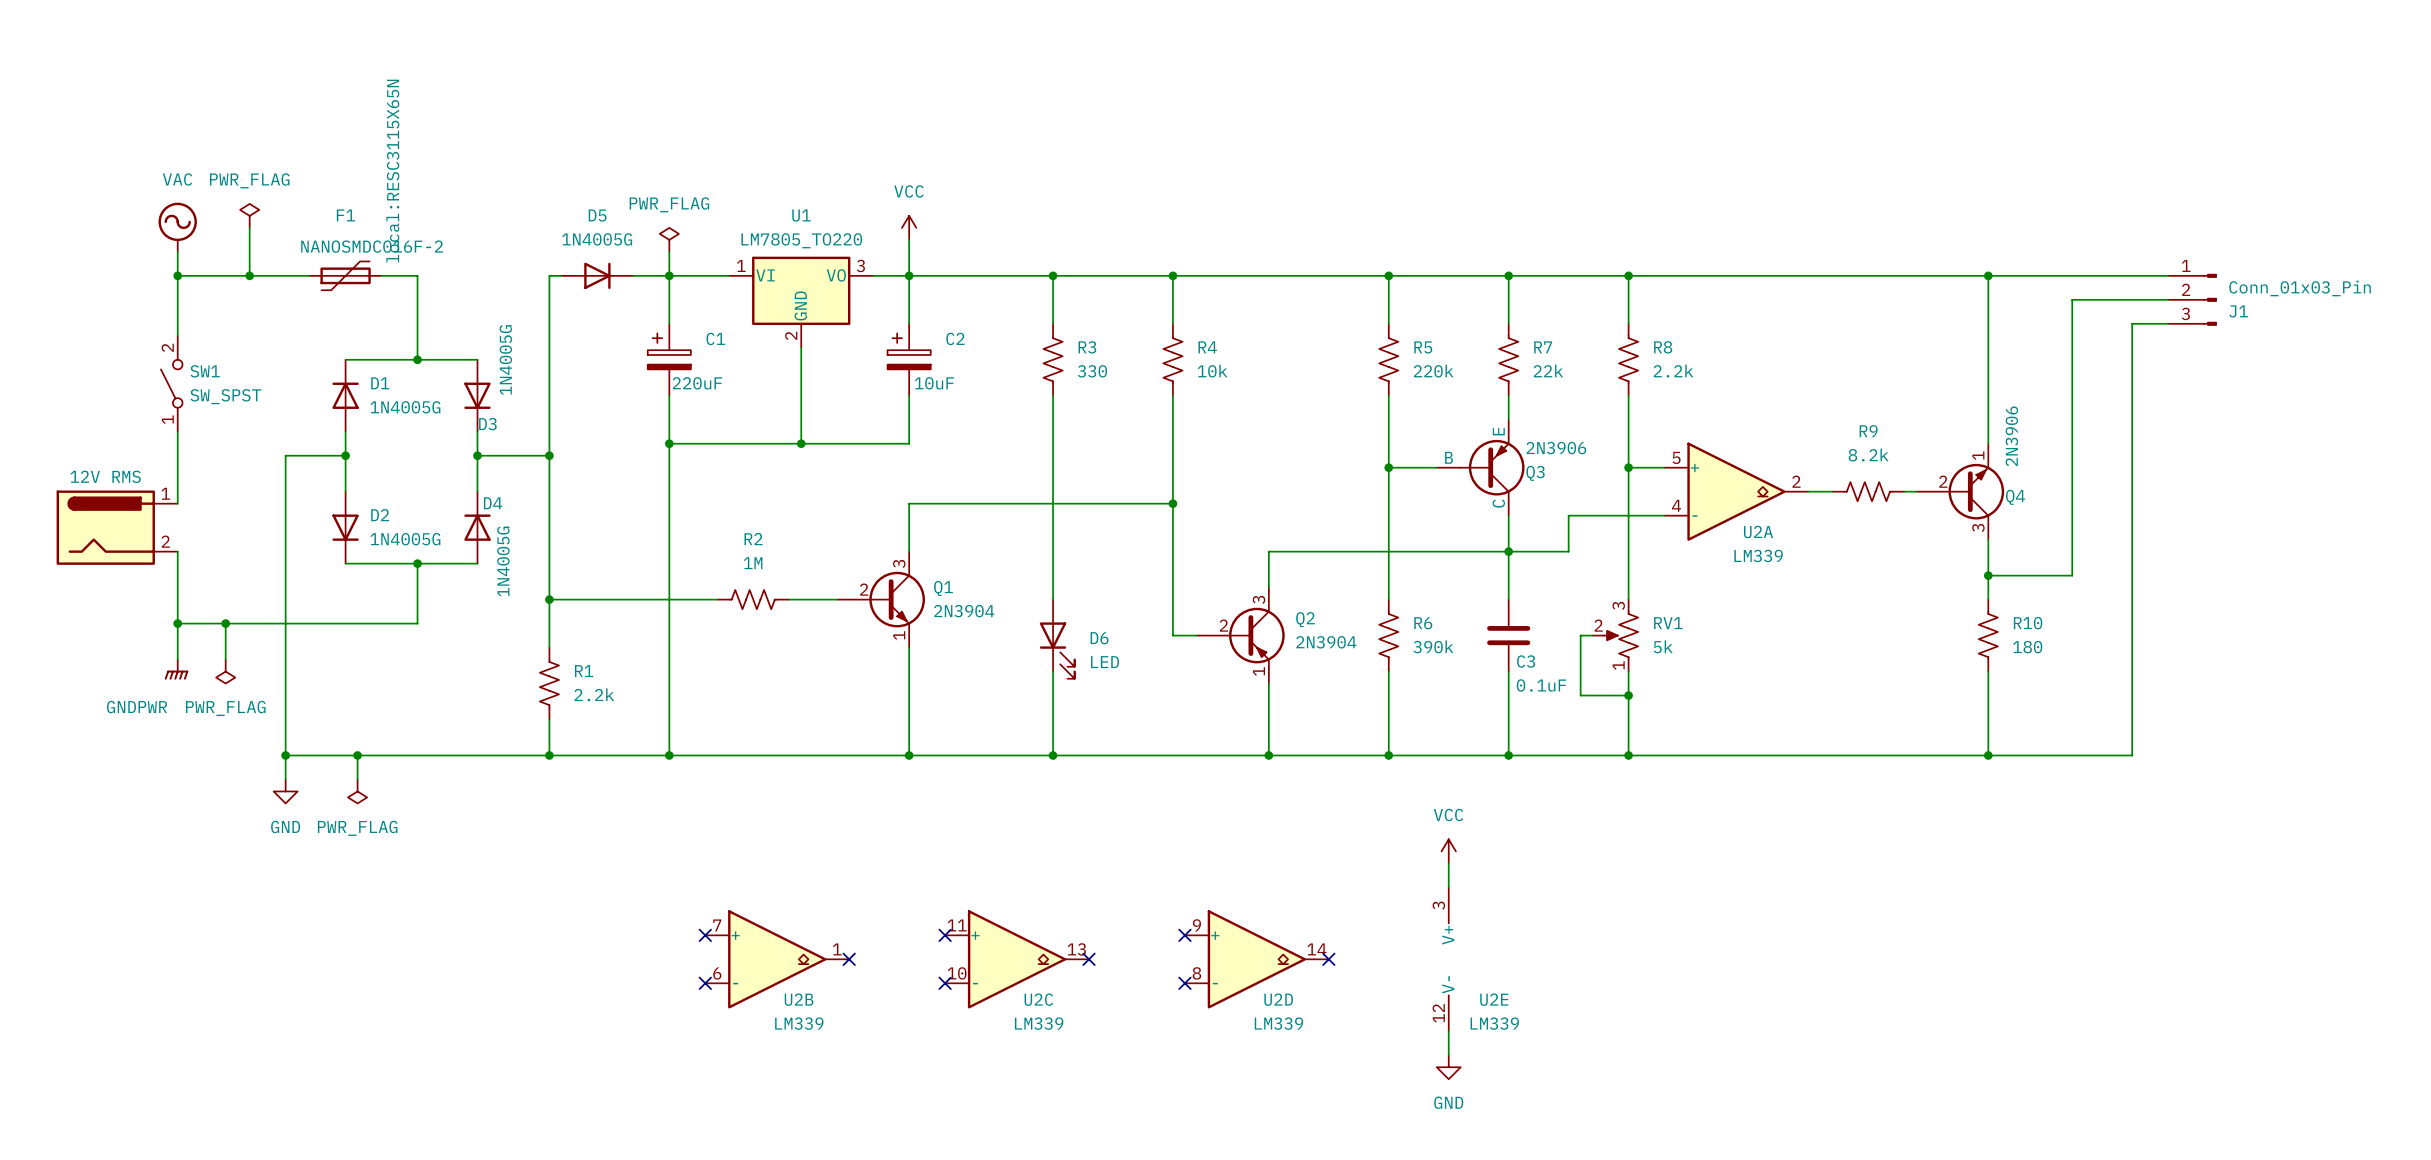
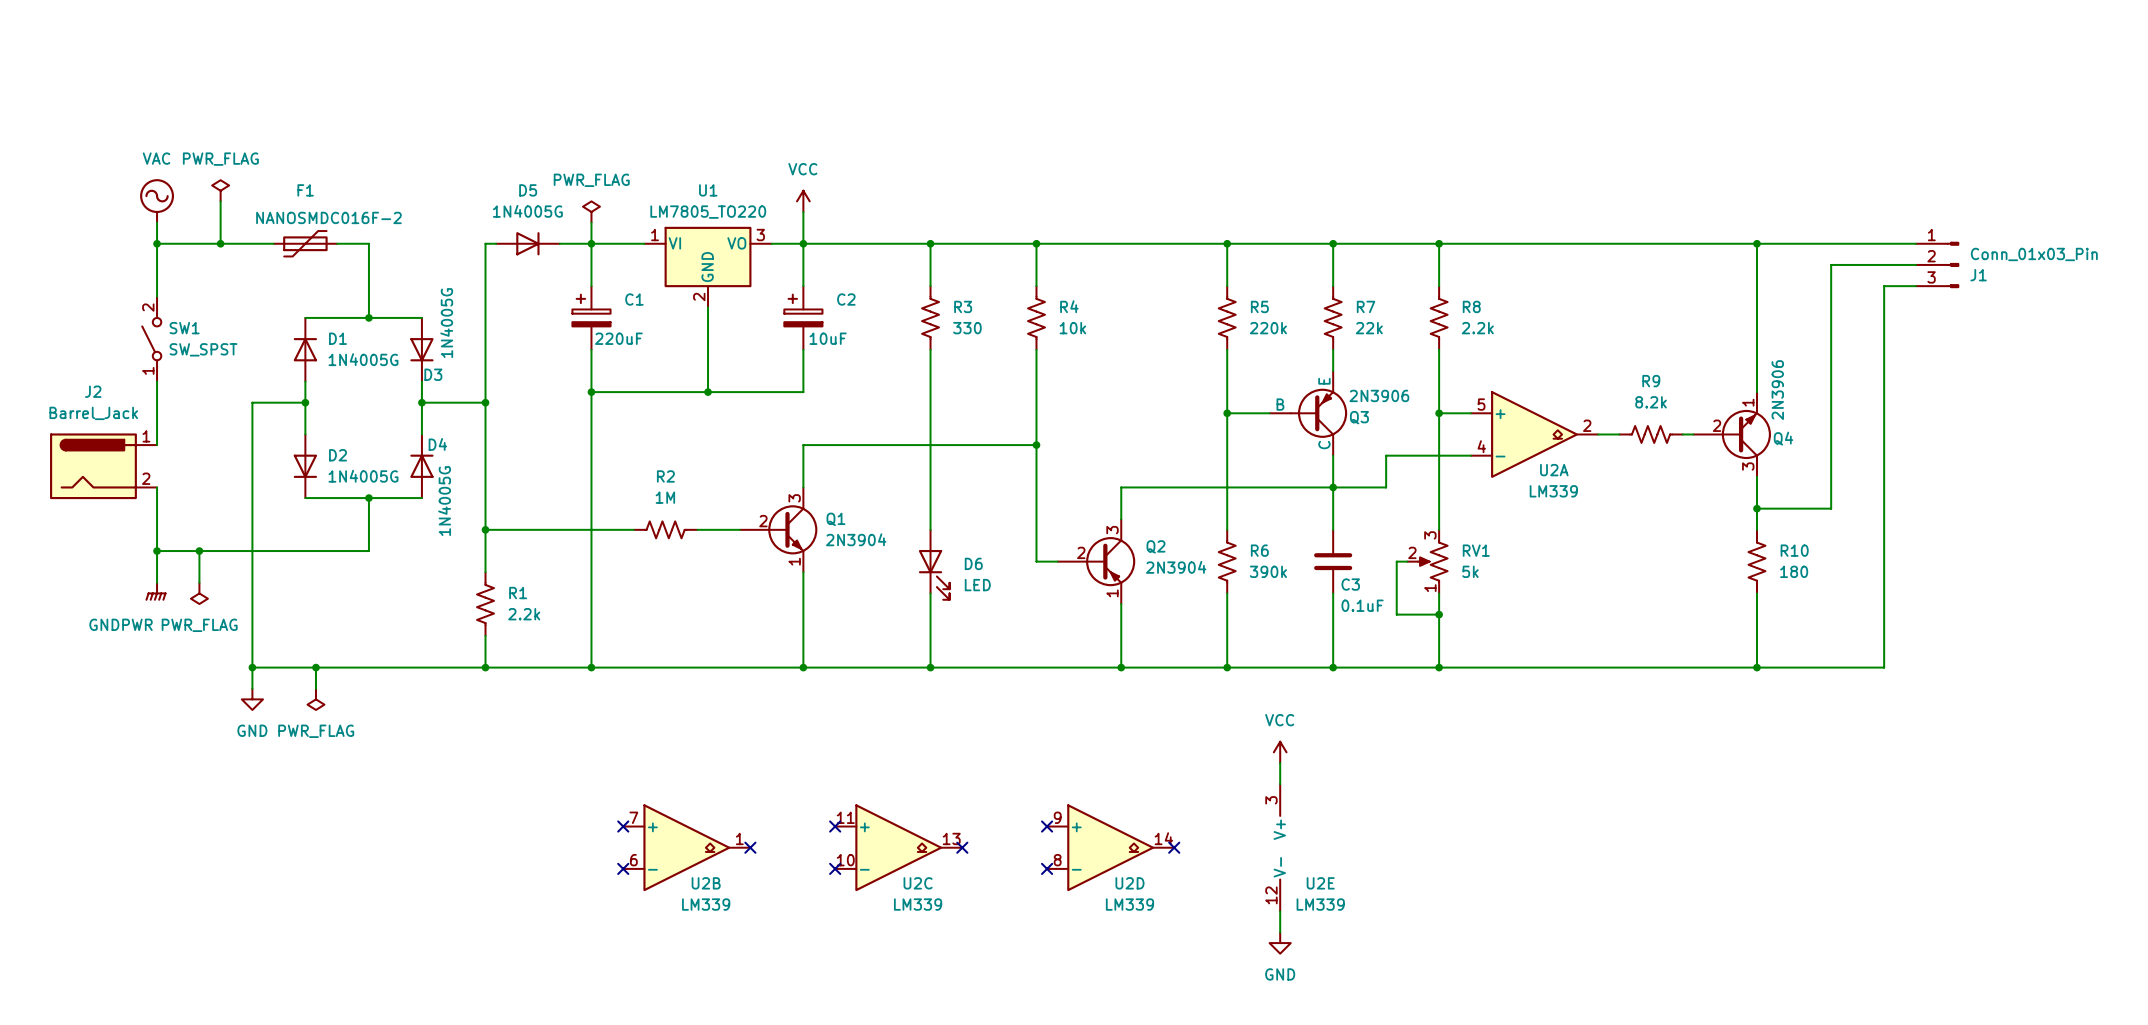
F1 text: local:RESC3115X65N (392, 171) -> none
J2: none -> Barrel_Jack (103, 466)
power symbol: 12V RMS (117, 527) -> none

